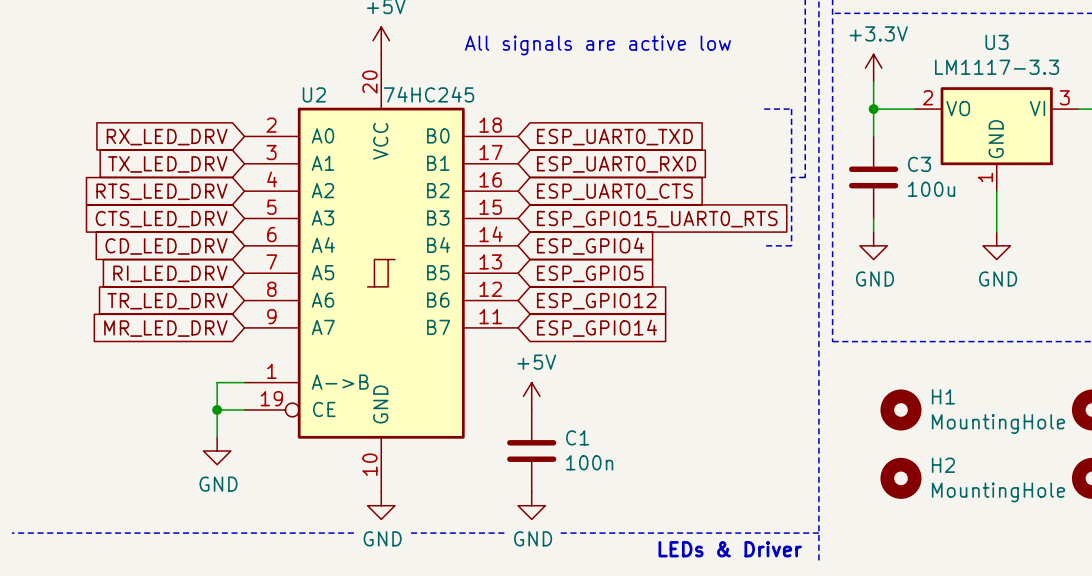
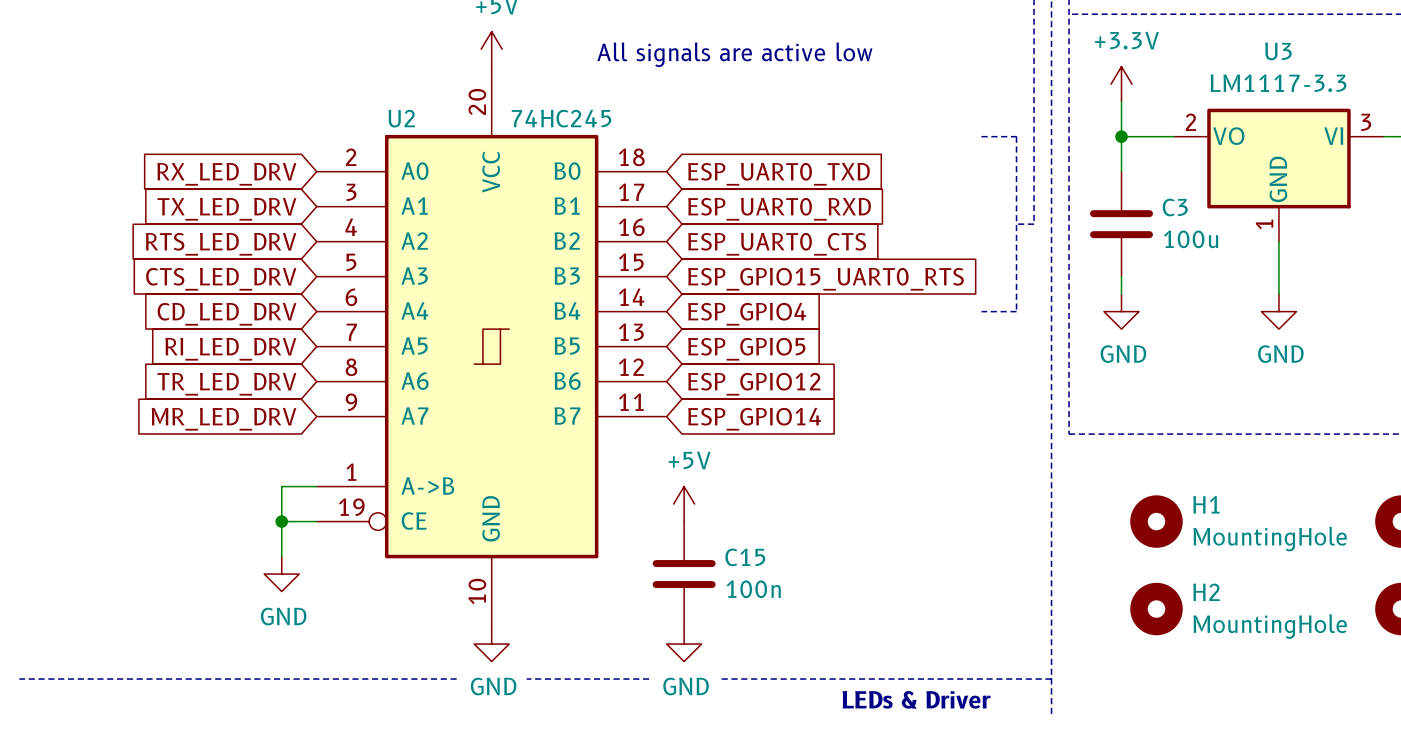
C1 name: C1 (577, 437) -> C15 (745, 557)

